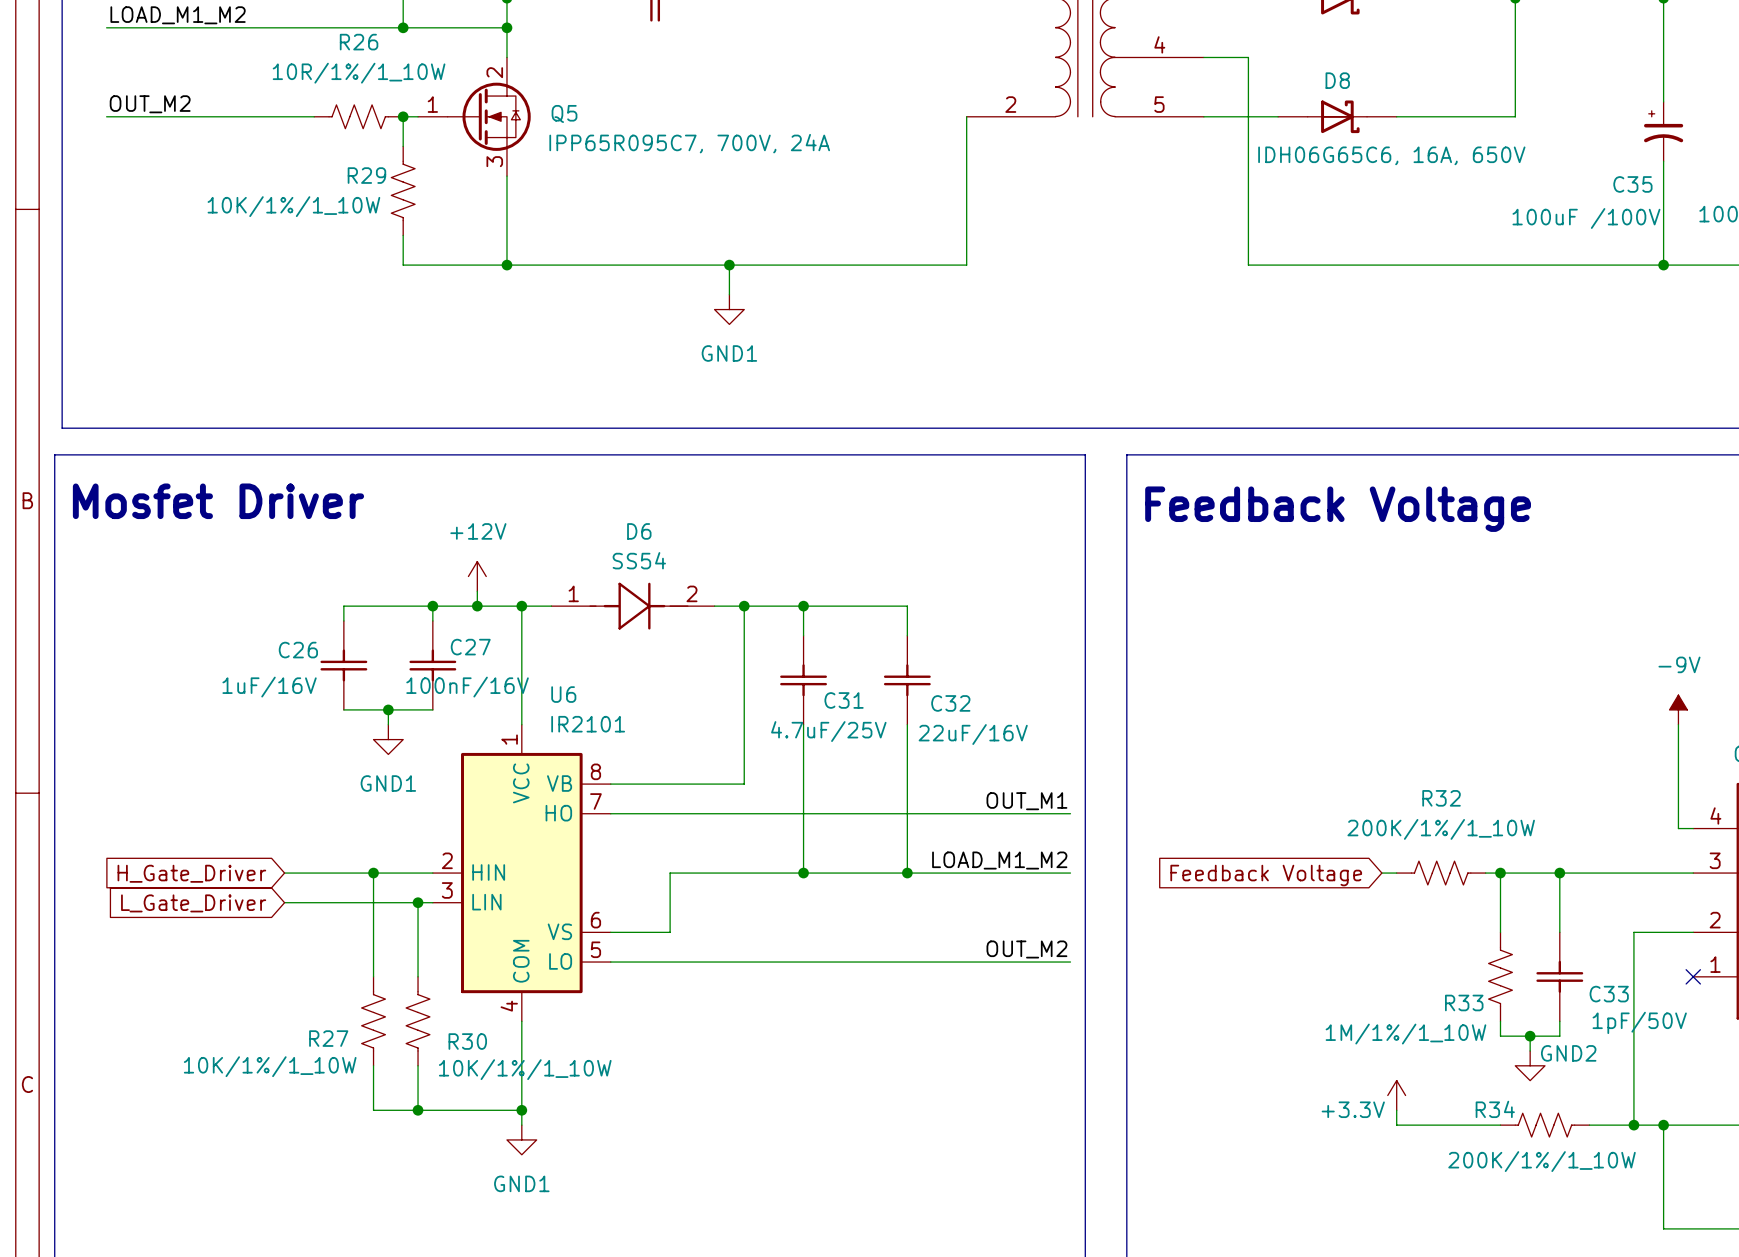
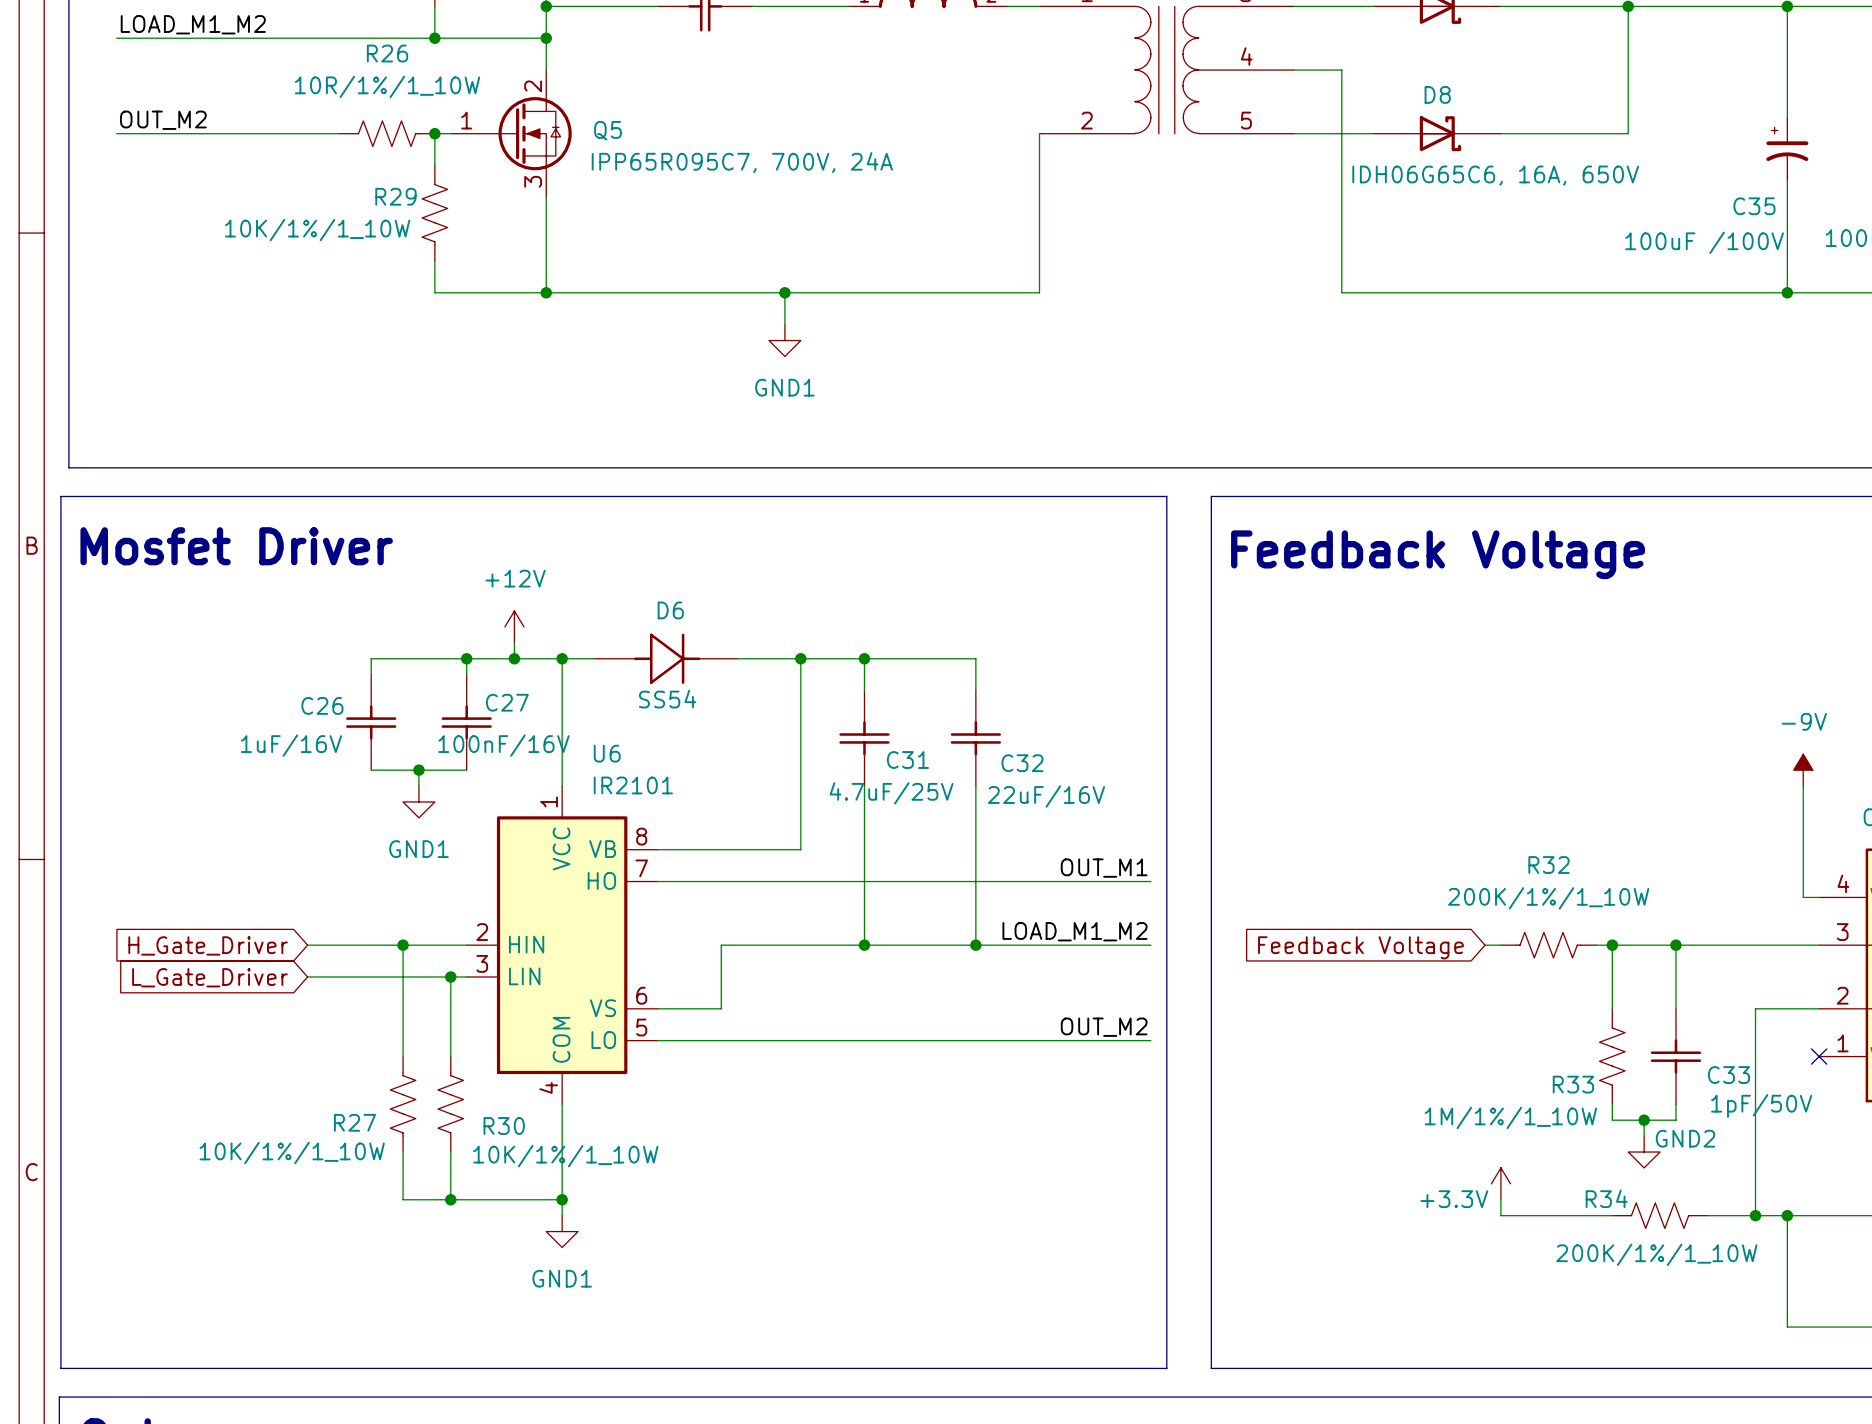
D6 name position: D6 (639, 531) -> D6 (670, 610)
D6 value position: SS54 (639, 560) -> SS54 (667, 699)
D6 symbol: [551, 582, 715, 630] -> [593, 633, 738, 684]

